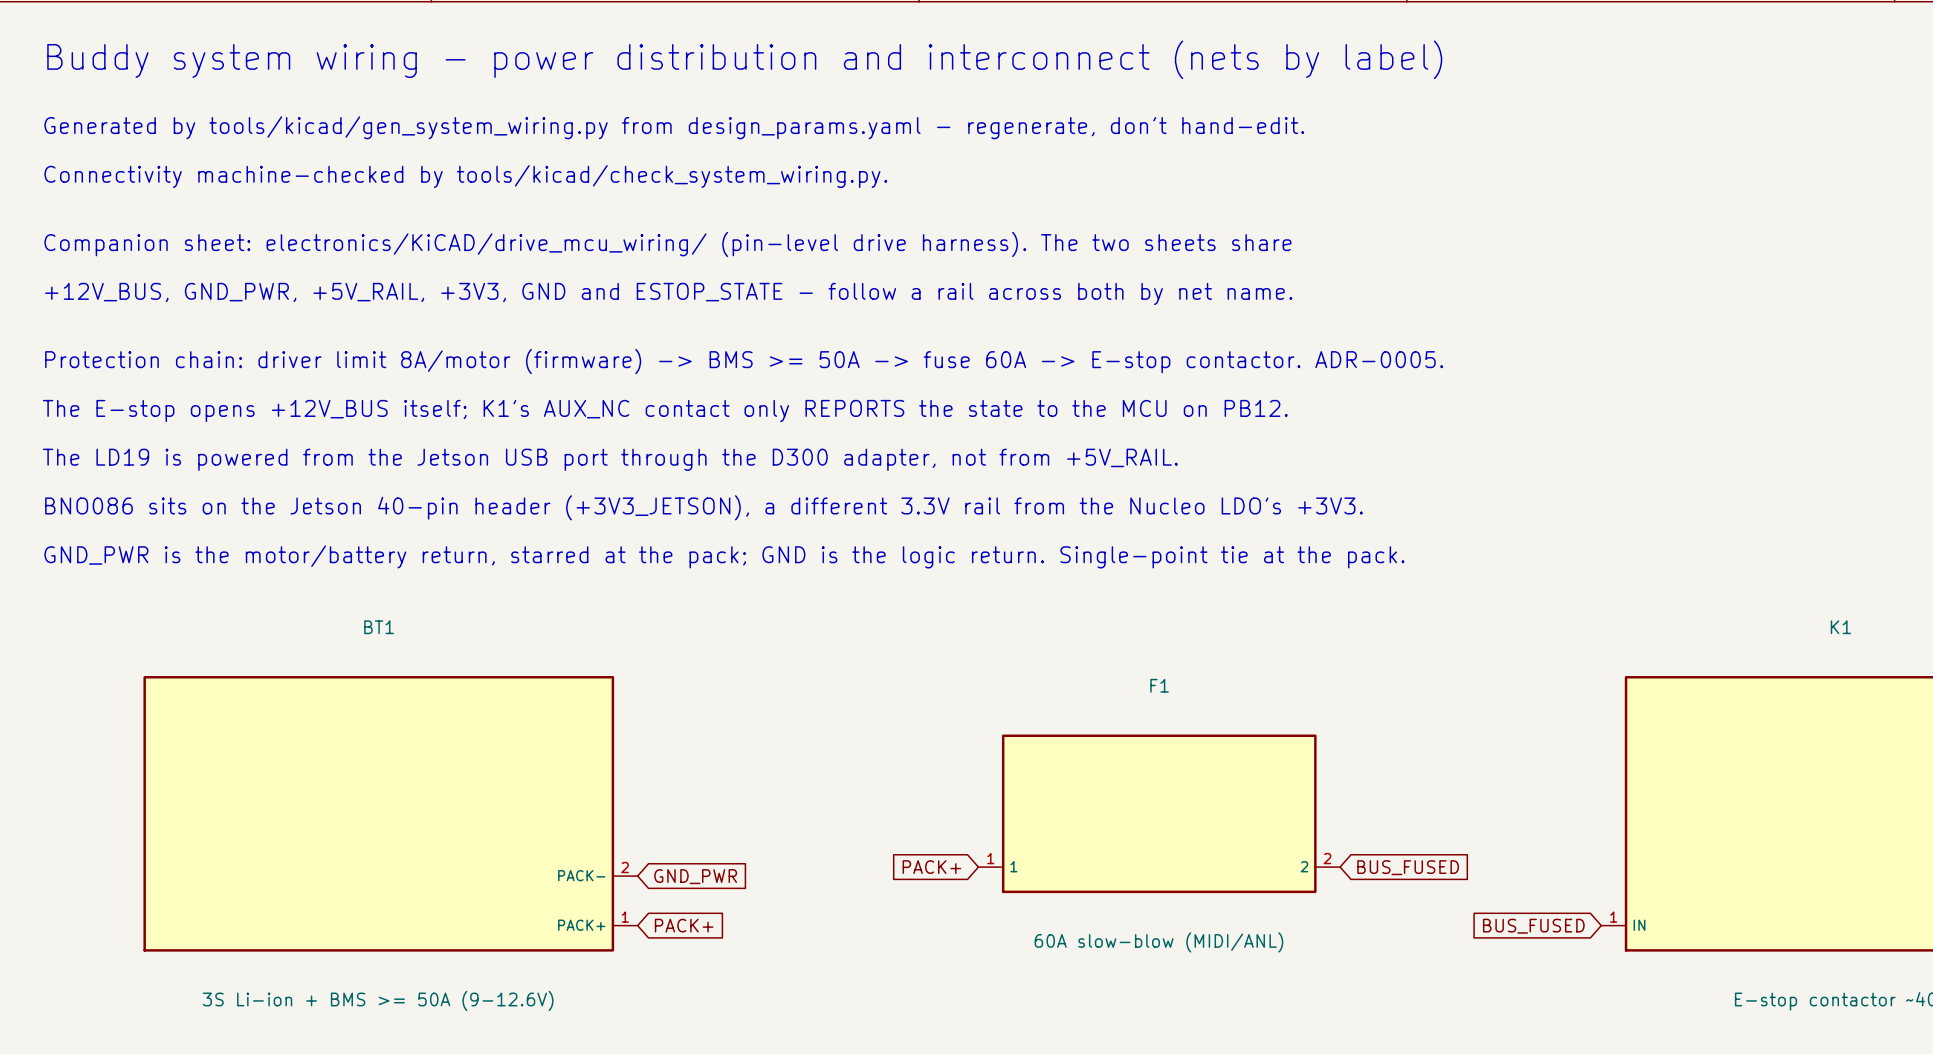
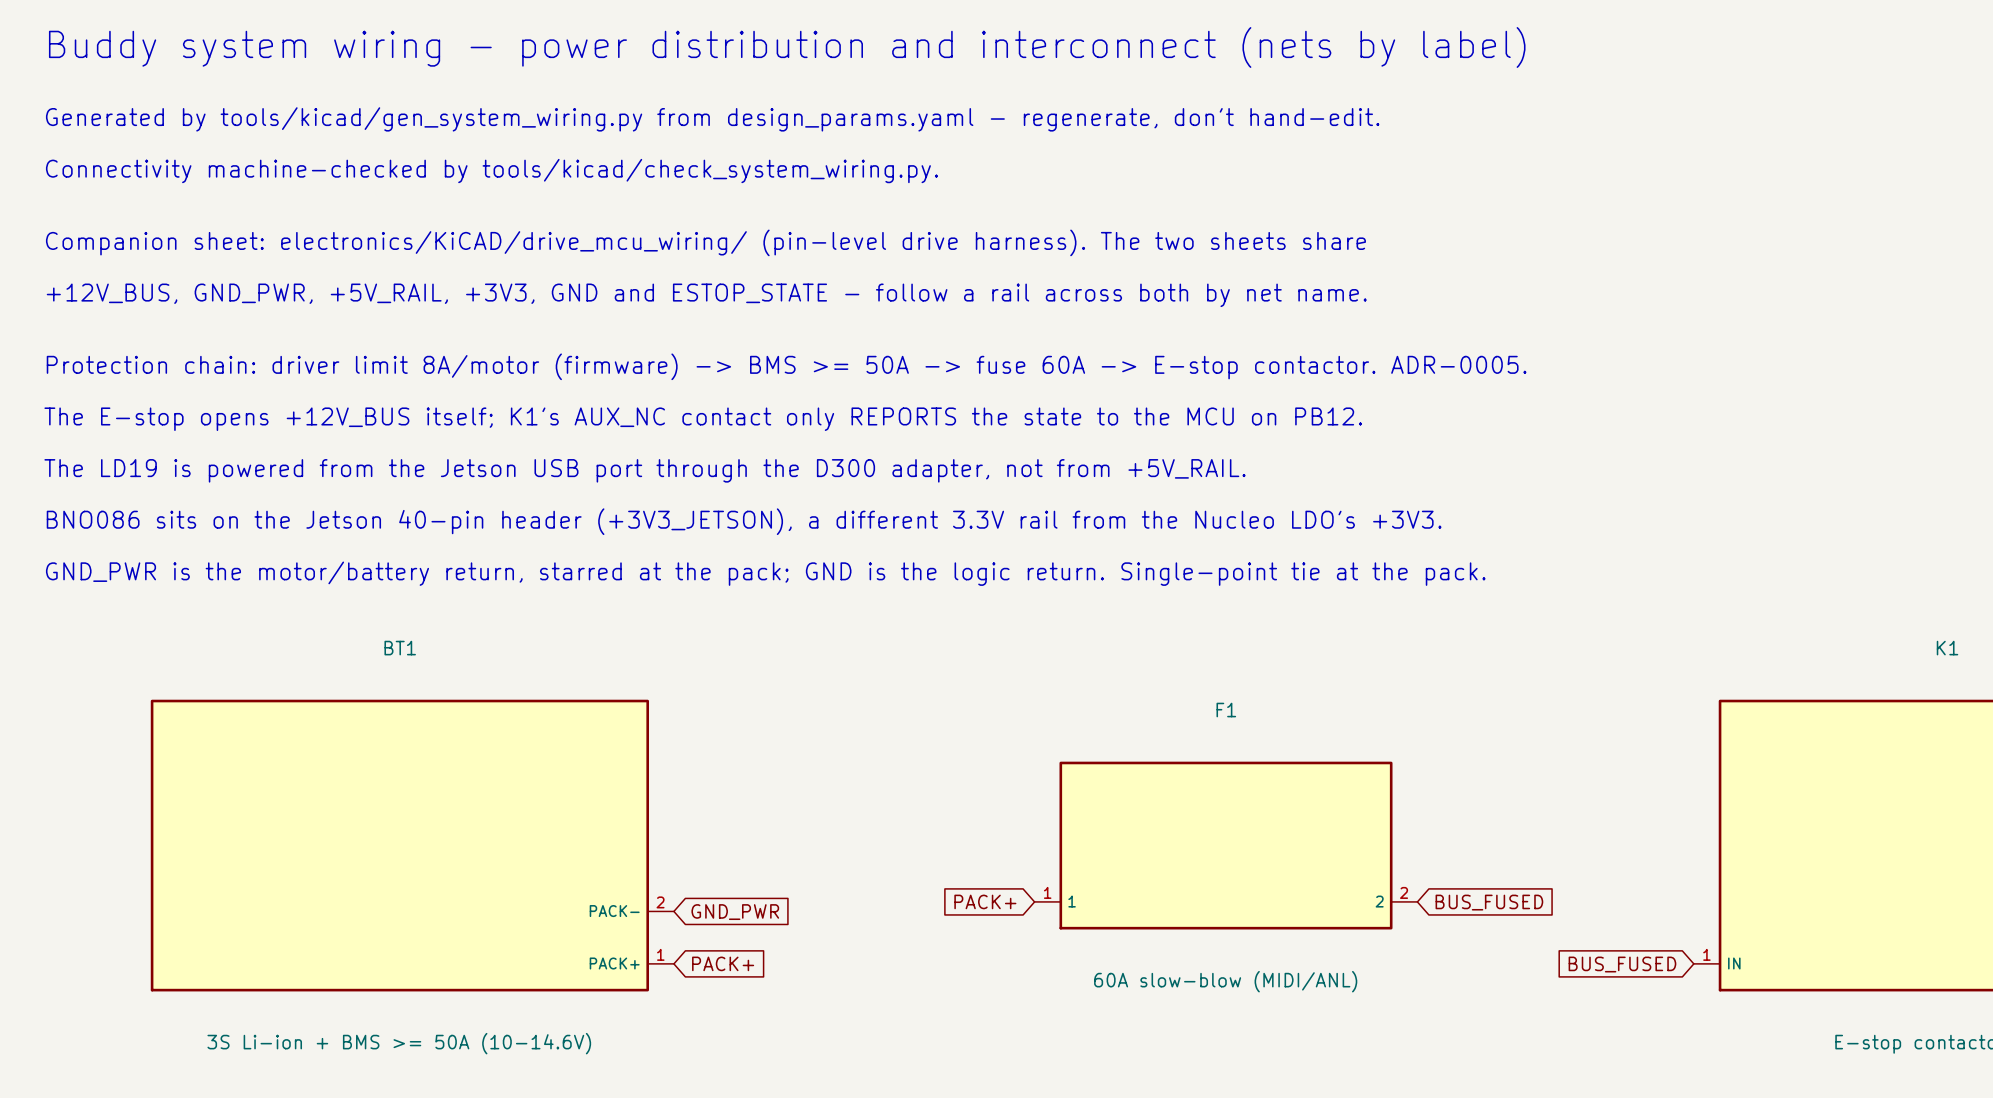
BT1 value: 3S Li-ion + BMS >= 50A (9-12.6V) (378, 1000) -> 3S Li-ion + BMS >= 50A (10-14.6V) (399, 1043)

